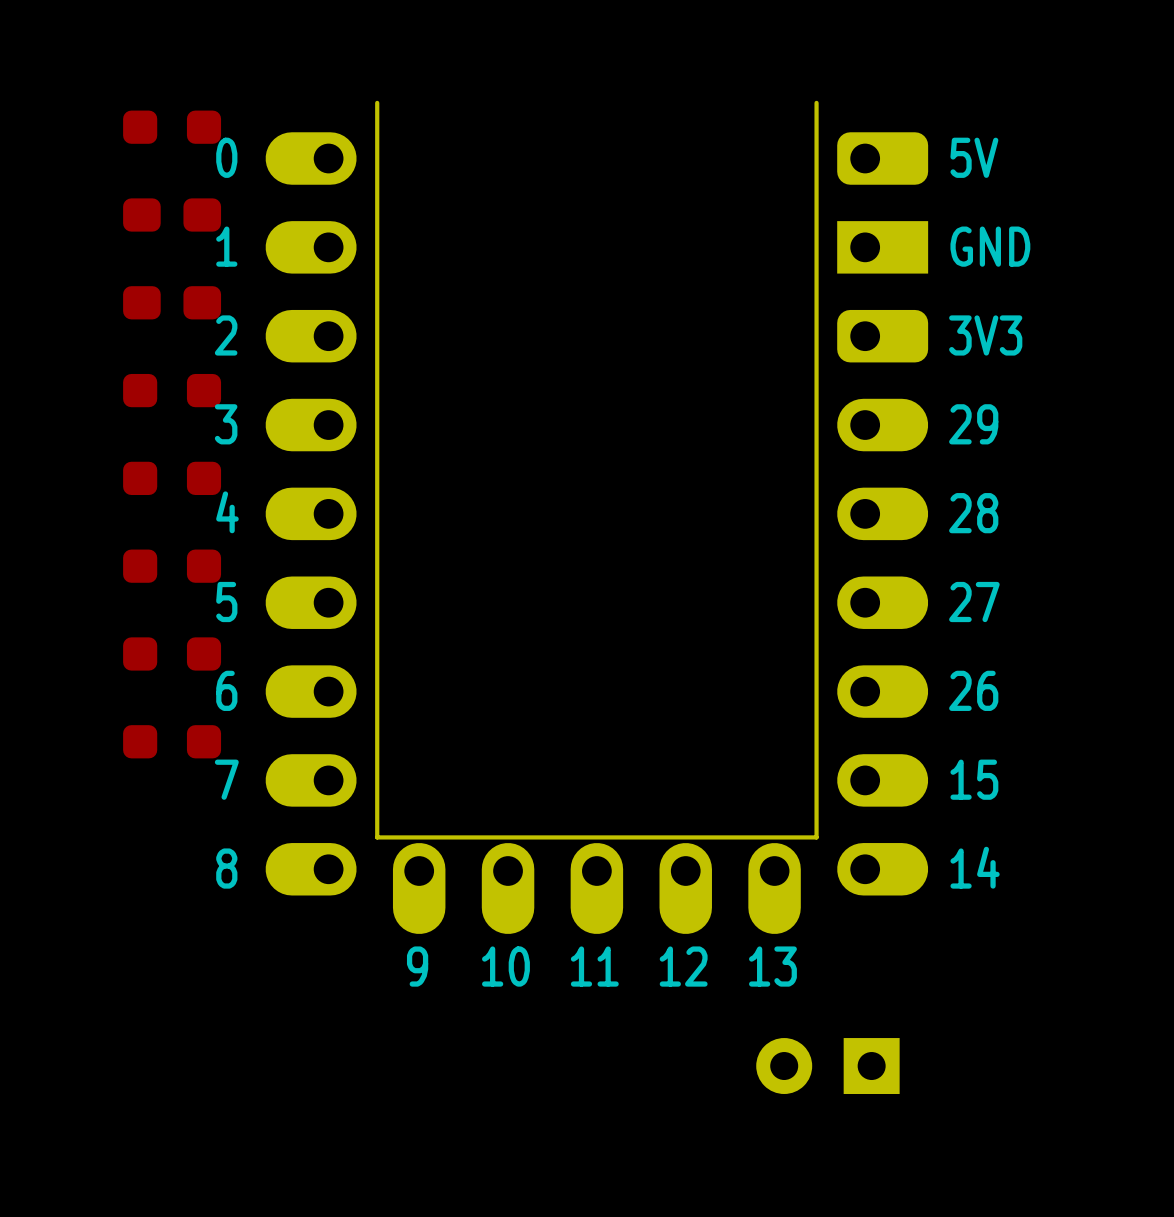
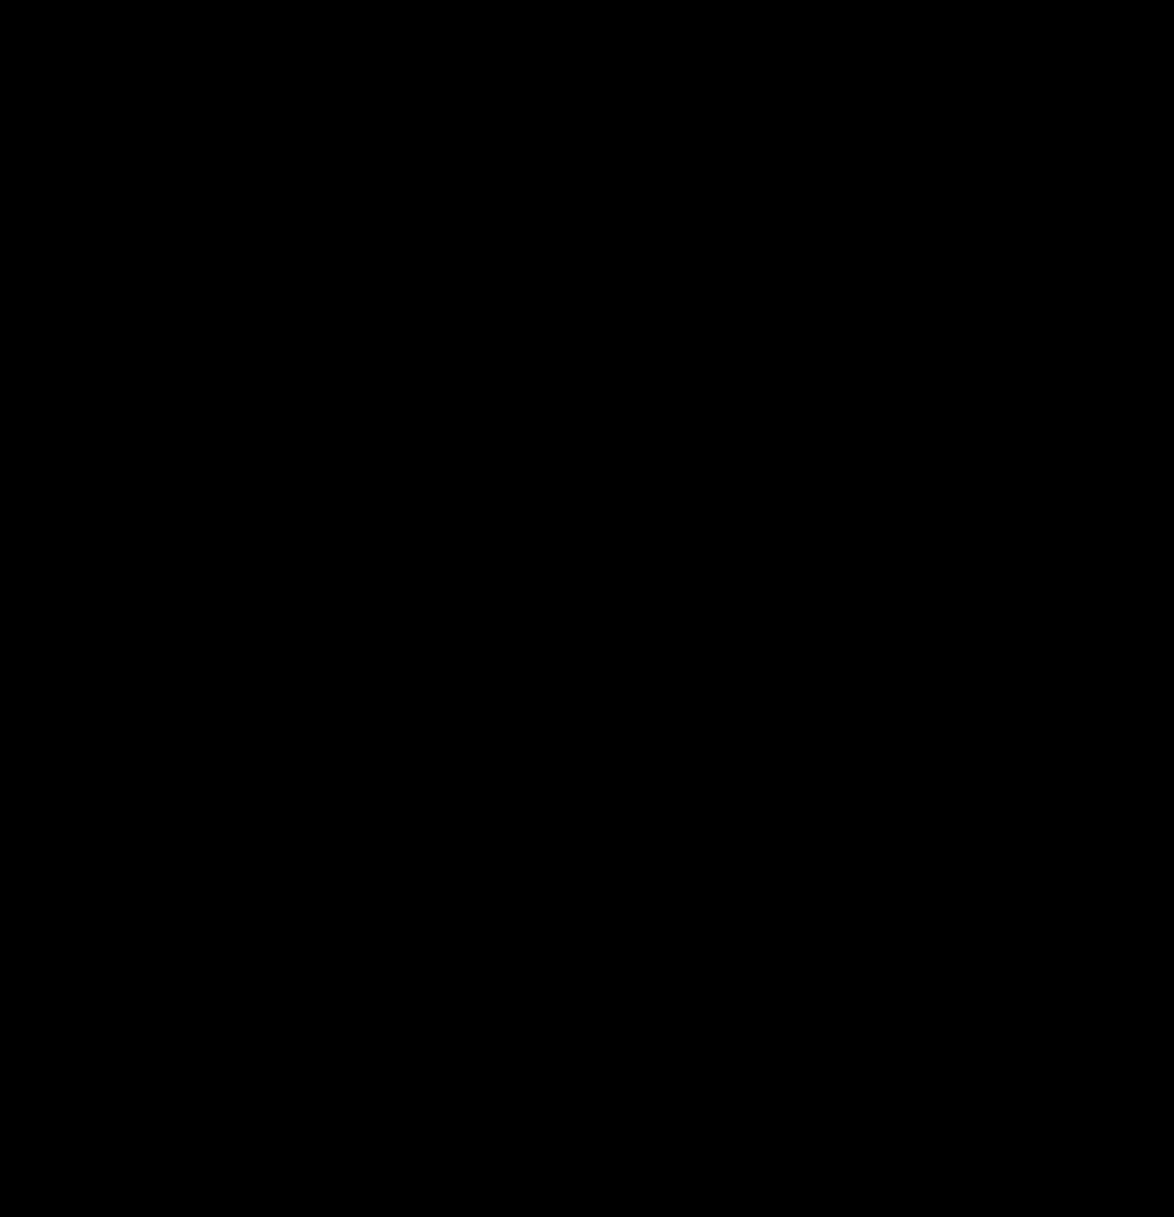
part: (172, 127) -> none
part: (172, 214) -> none
part: (172, 302) -> none
part: (172, 390) -> none
part: (172, 478) -> none
part: (596, 517) -> none
part: (172, 566) -> none
part: (172, 653) -> none
part: (172, 741) -> none
part: (827, 1066) -> none

